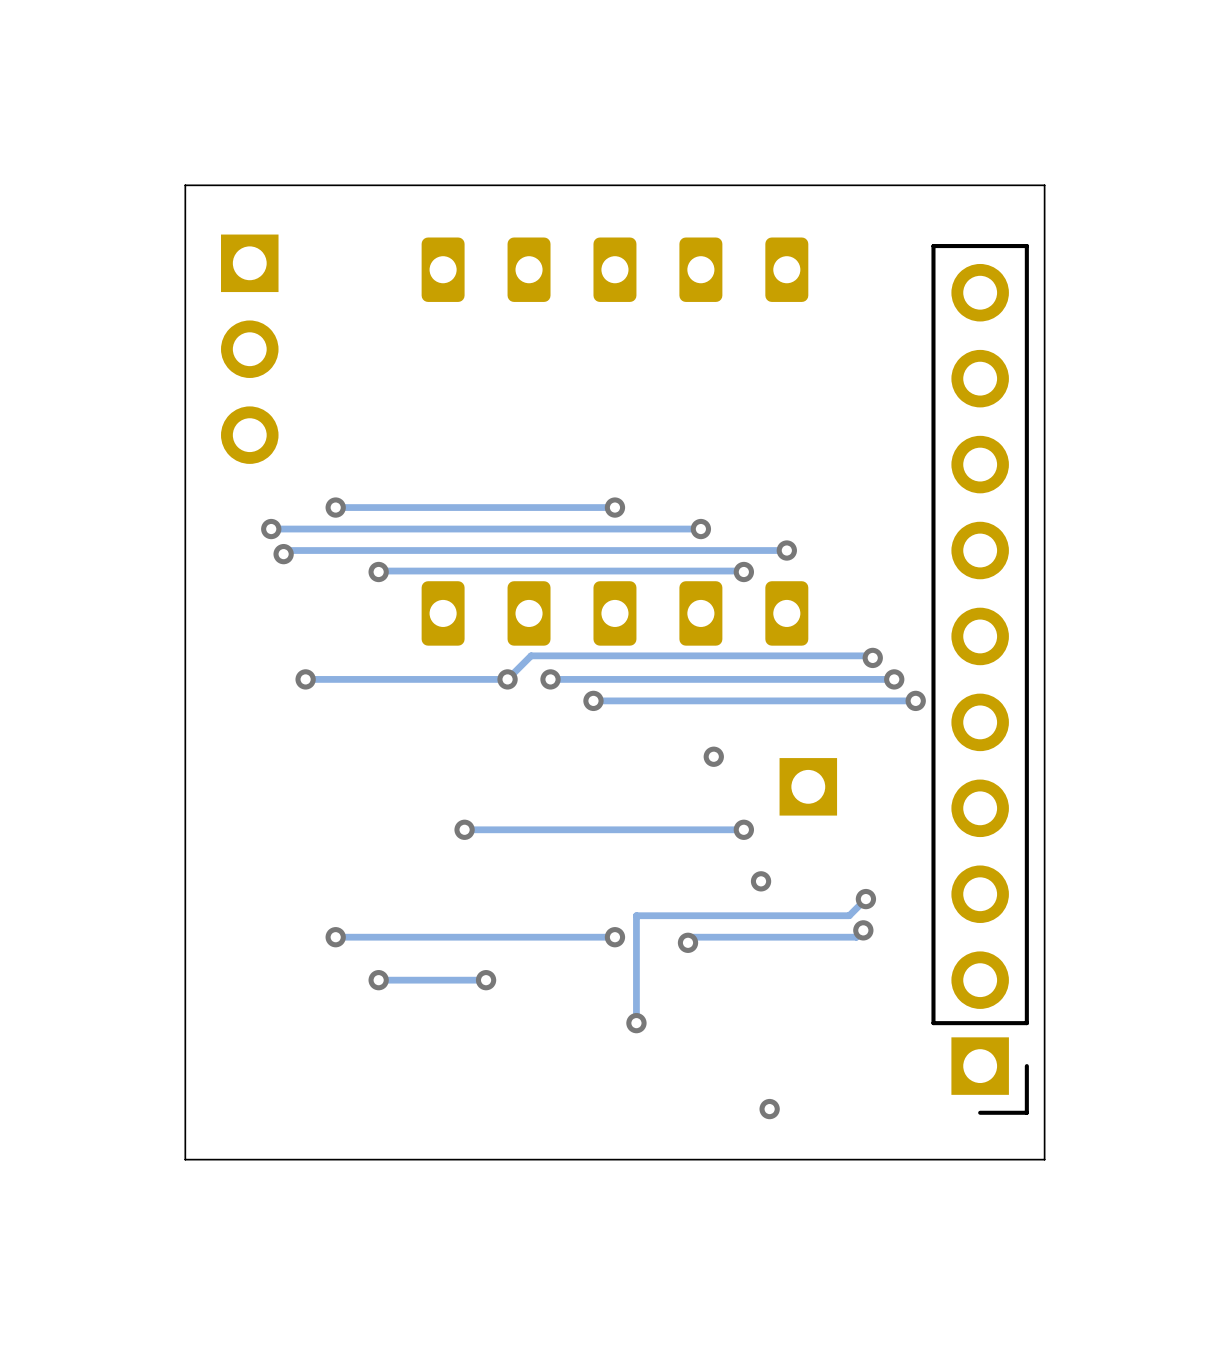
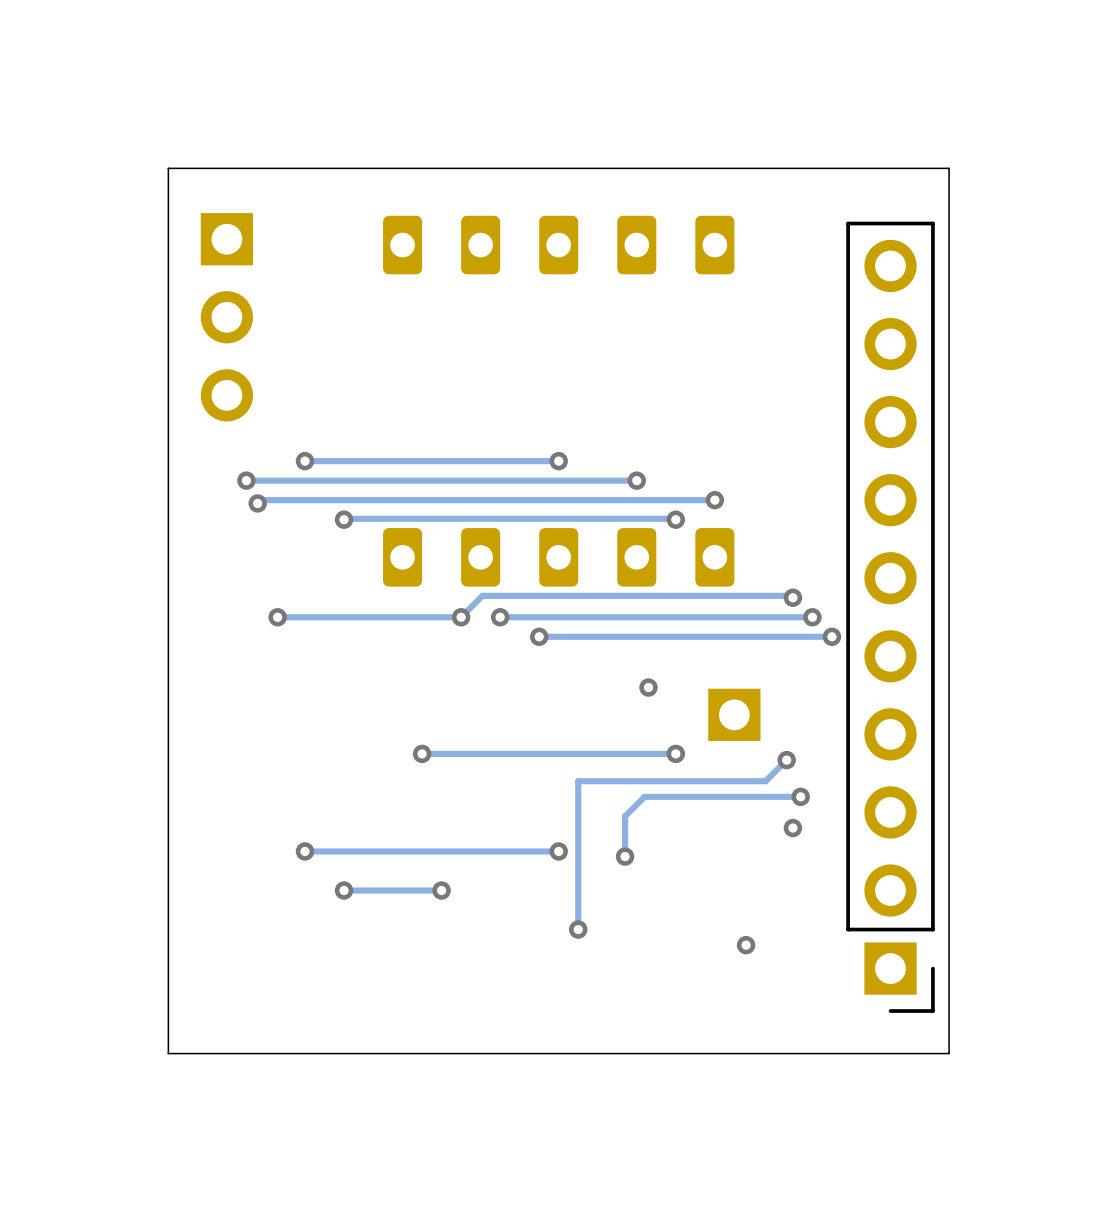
via: none -> (786, 760)
via: none -> (800, 796)
via: (761, 881) -> none
track: (865, 899) (849, 915) (636, 915) -> (786, 760) (765, 781) (578, 781) (578, 831)
via: (865, 899) -> none
via: none -> (792, 828)
track: (863, 930) (856, 937) (693, 937) (688, 942) -> (800, 796) (644, 796) (625, 816) (625, 856)
via: (863, 930) -> none
via: none -> (746, 945)
via: (769, 1109) -> none

